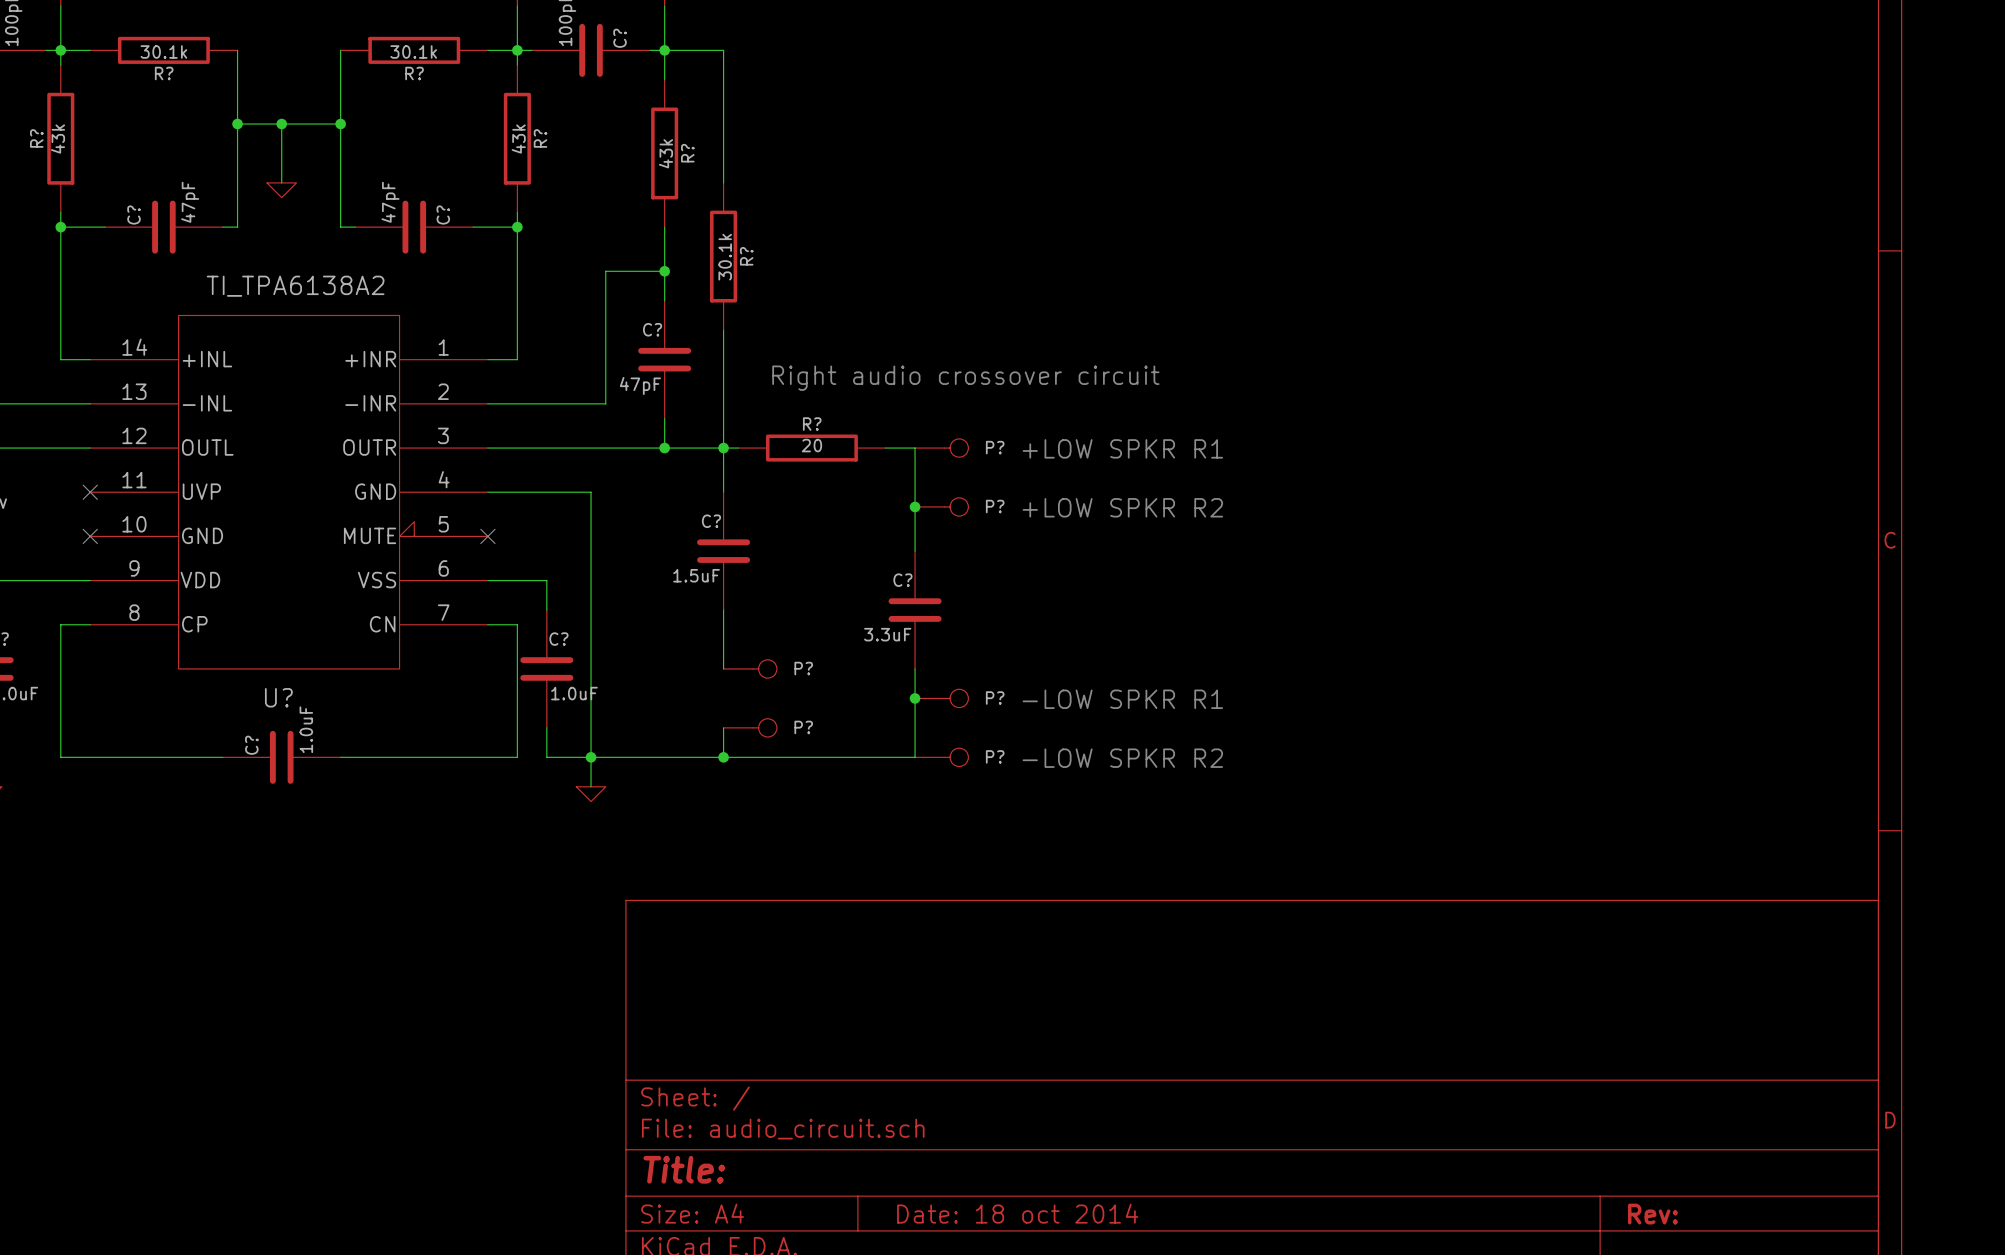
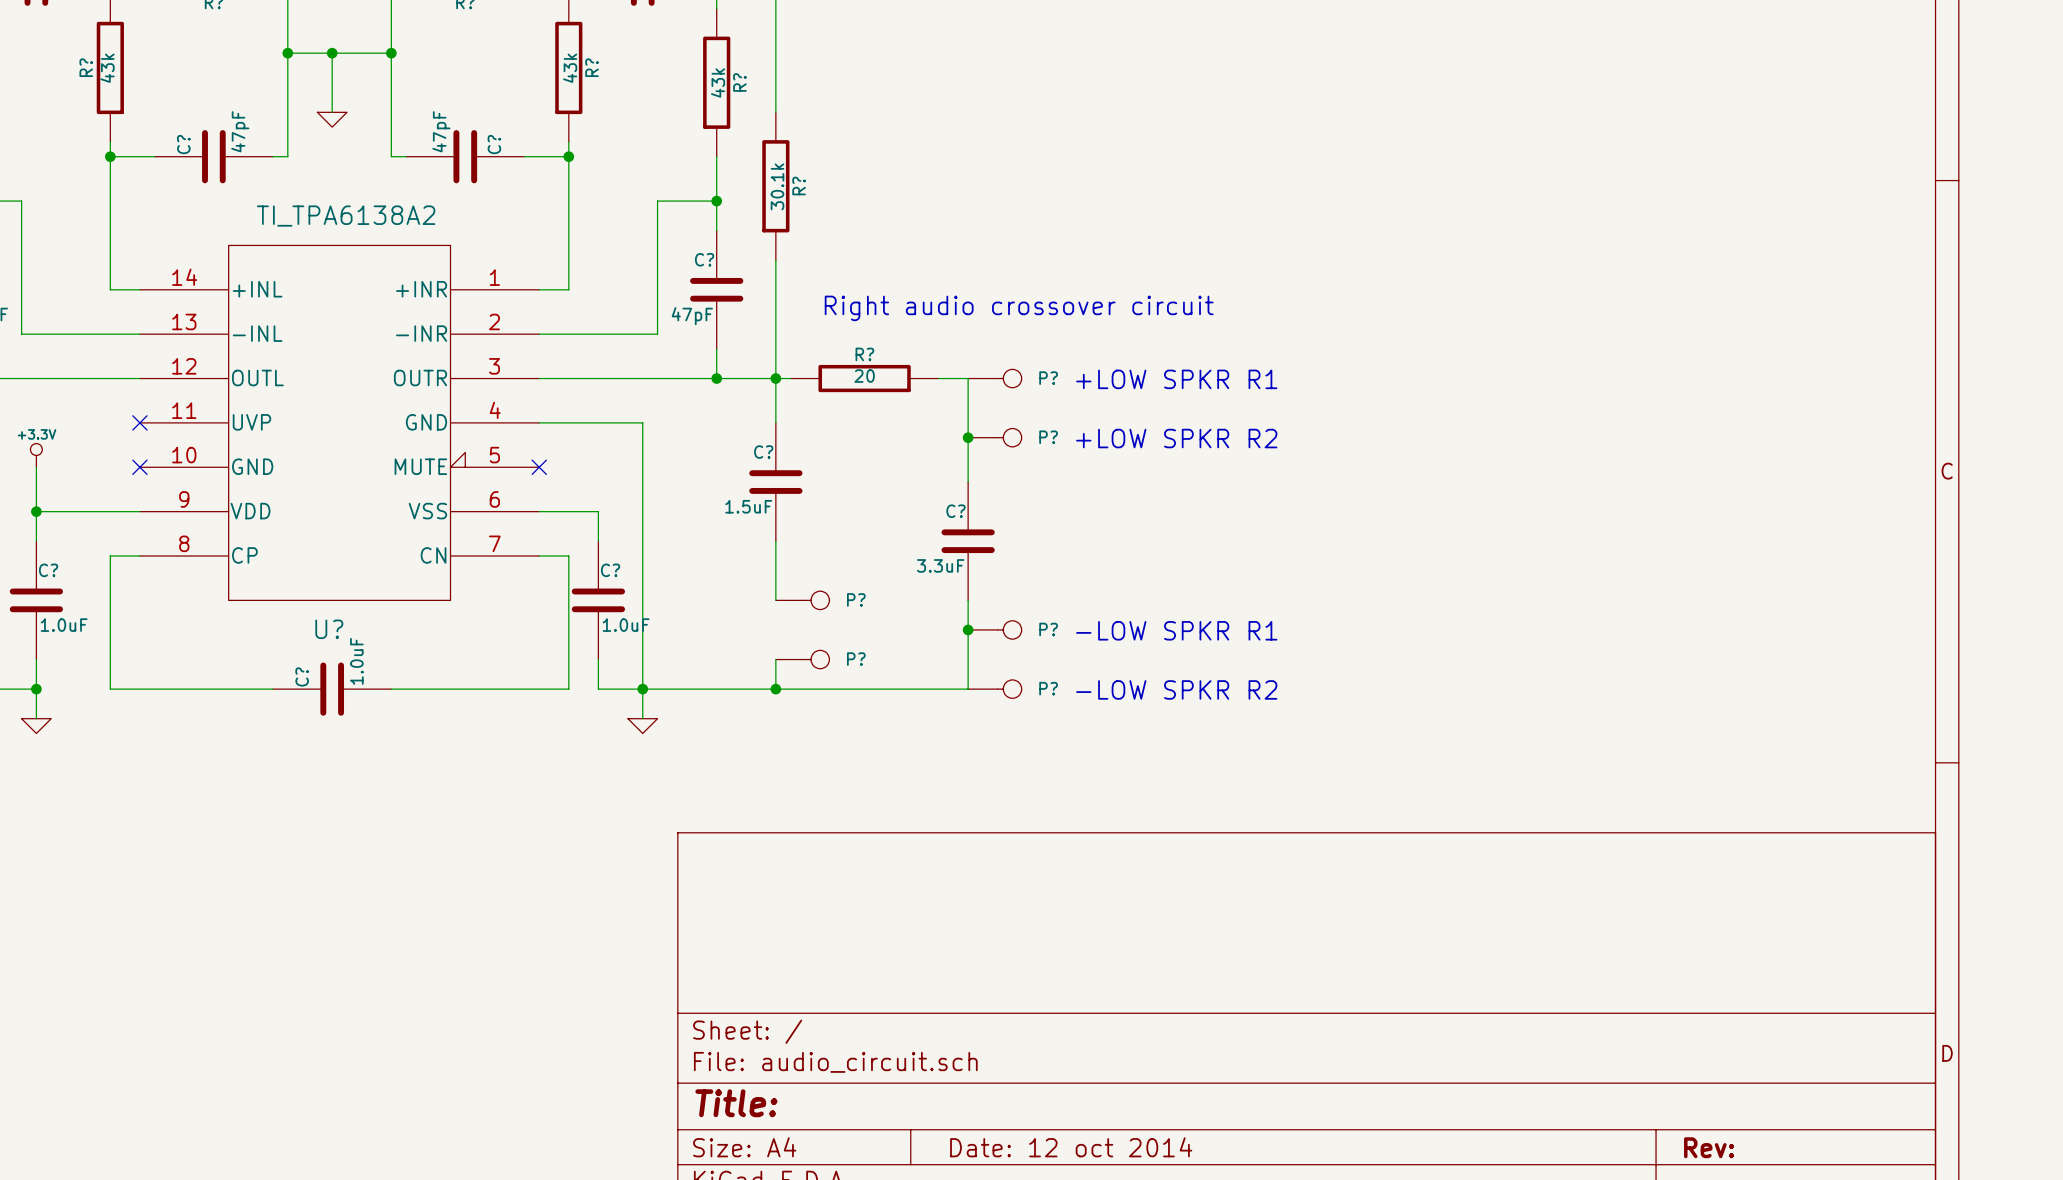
title block: Date: 18 oct 2014 (1017, 1213) -> Date: 12 oct 2014 (1071, 1147)

